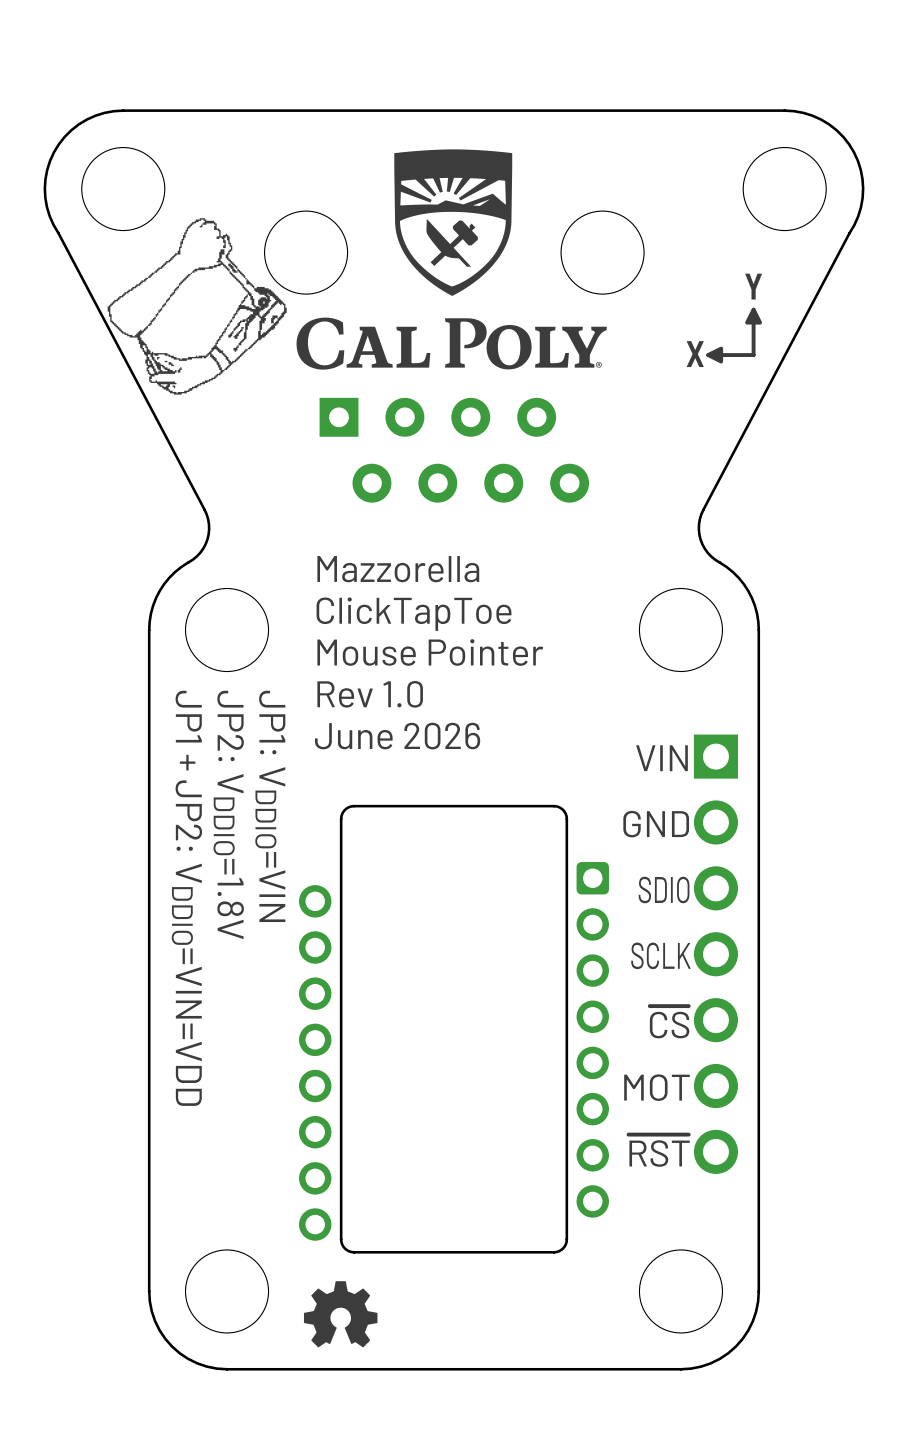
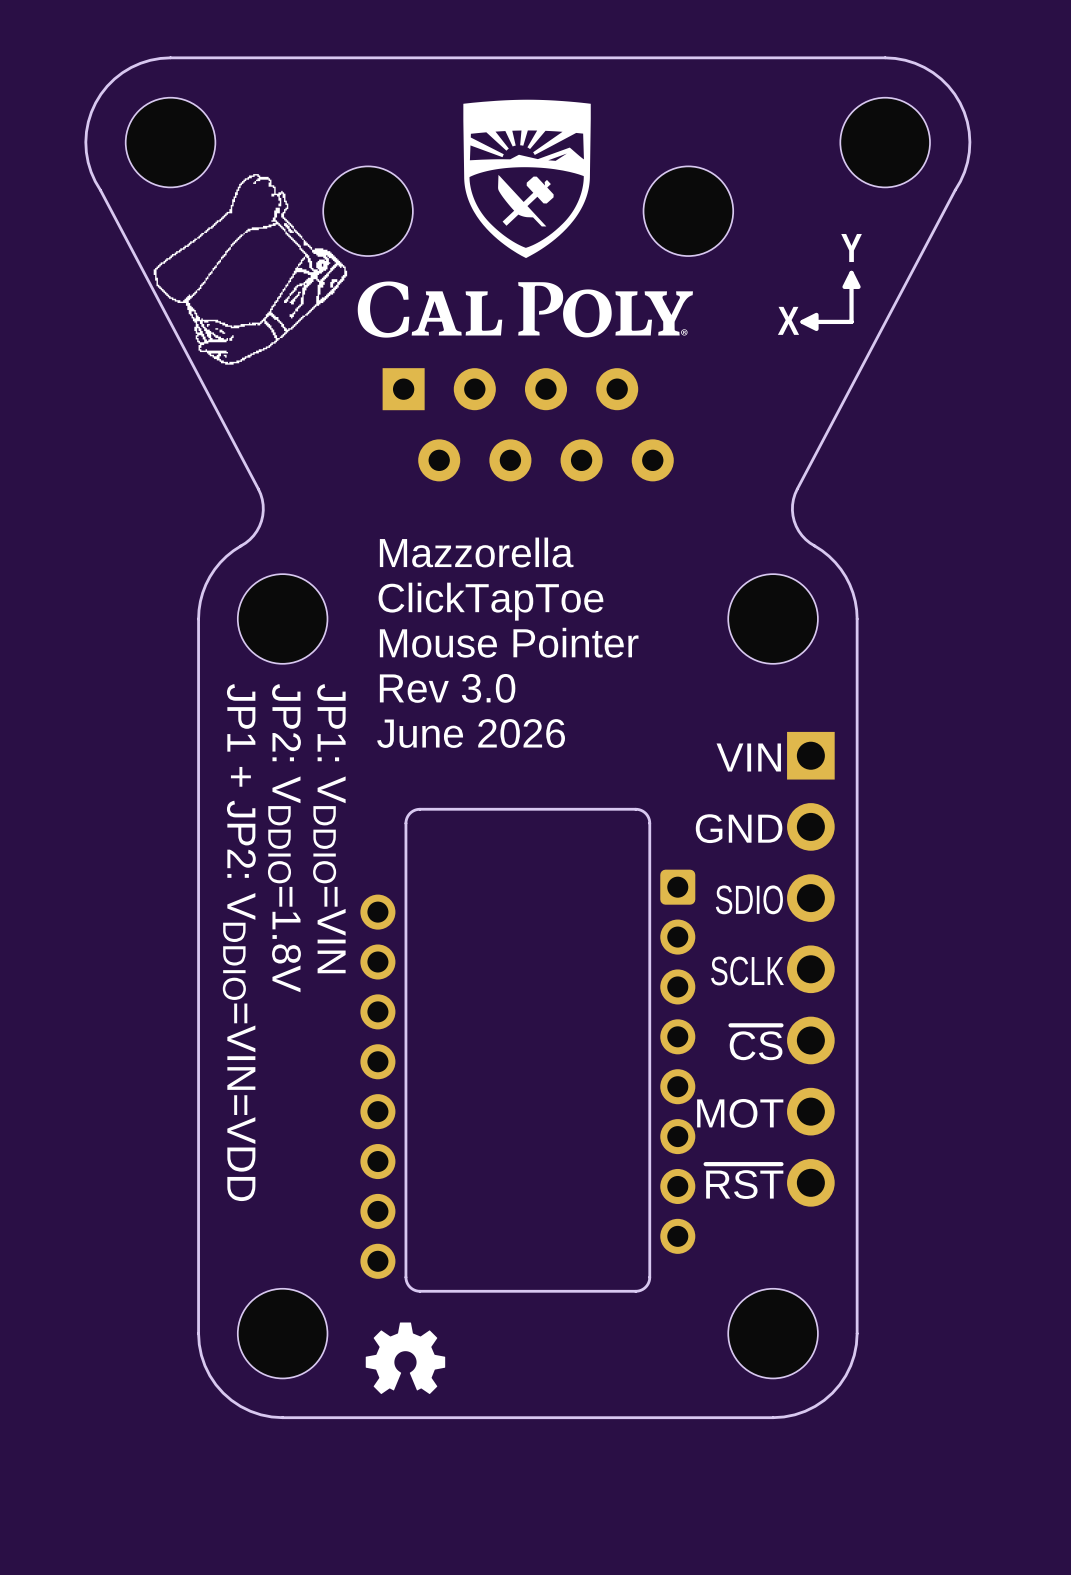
text: Rev 1.0 (370, 694) -> Rev 3.0 (447, 688)

